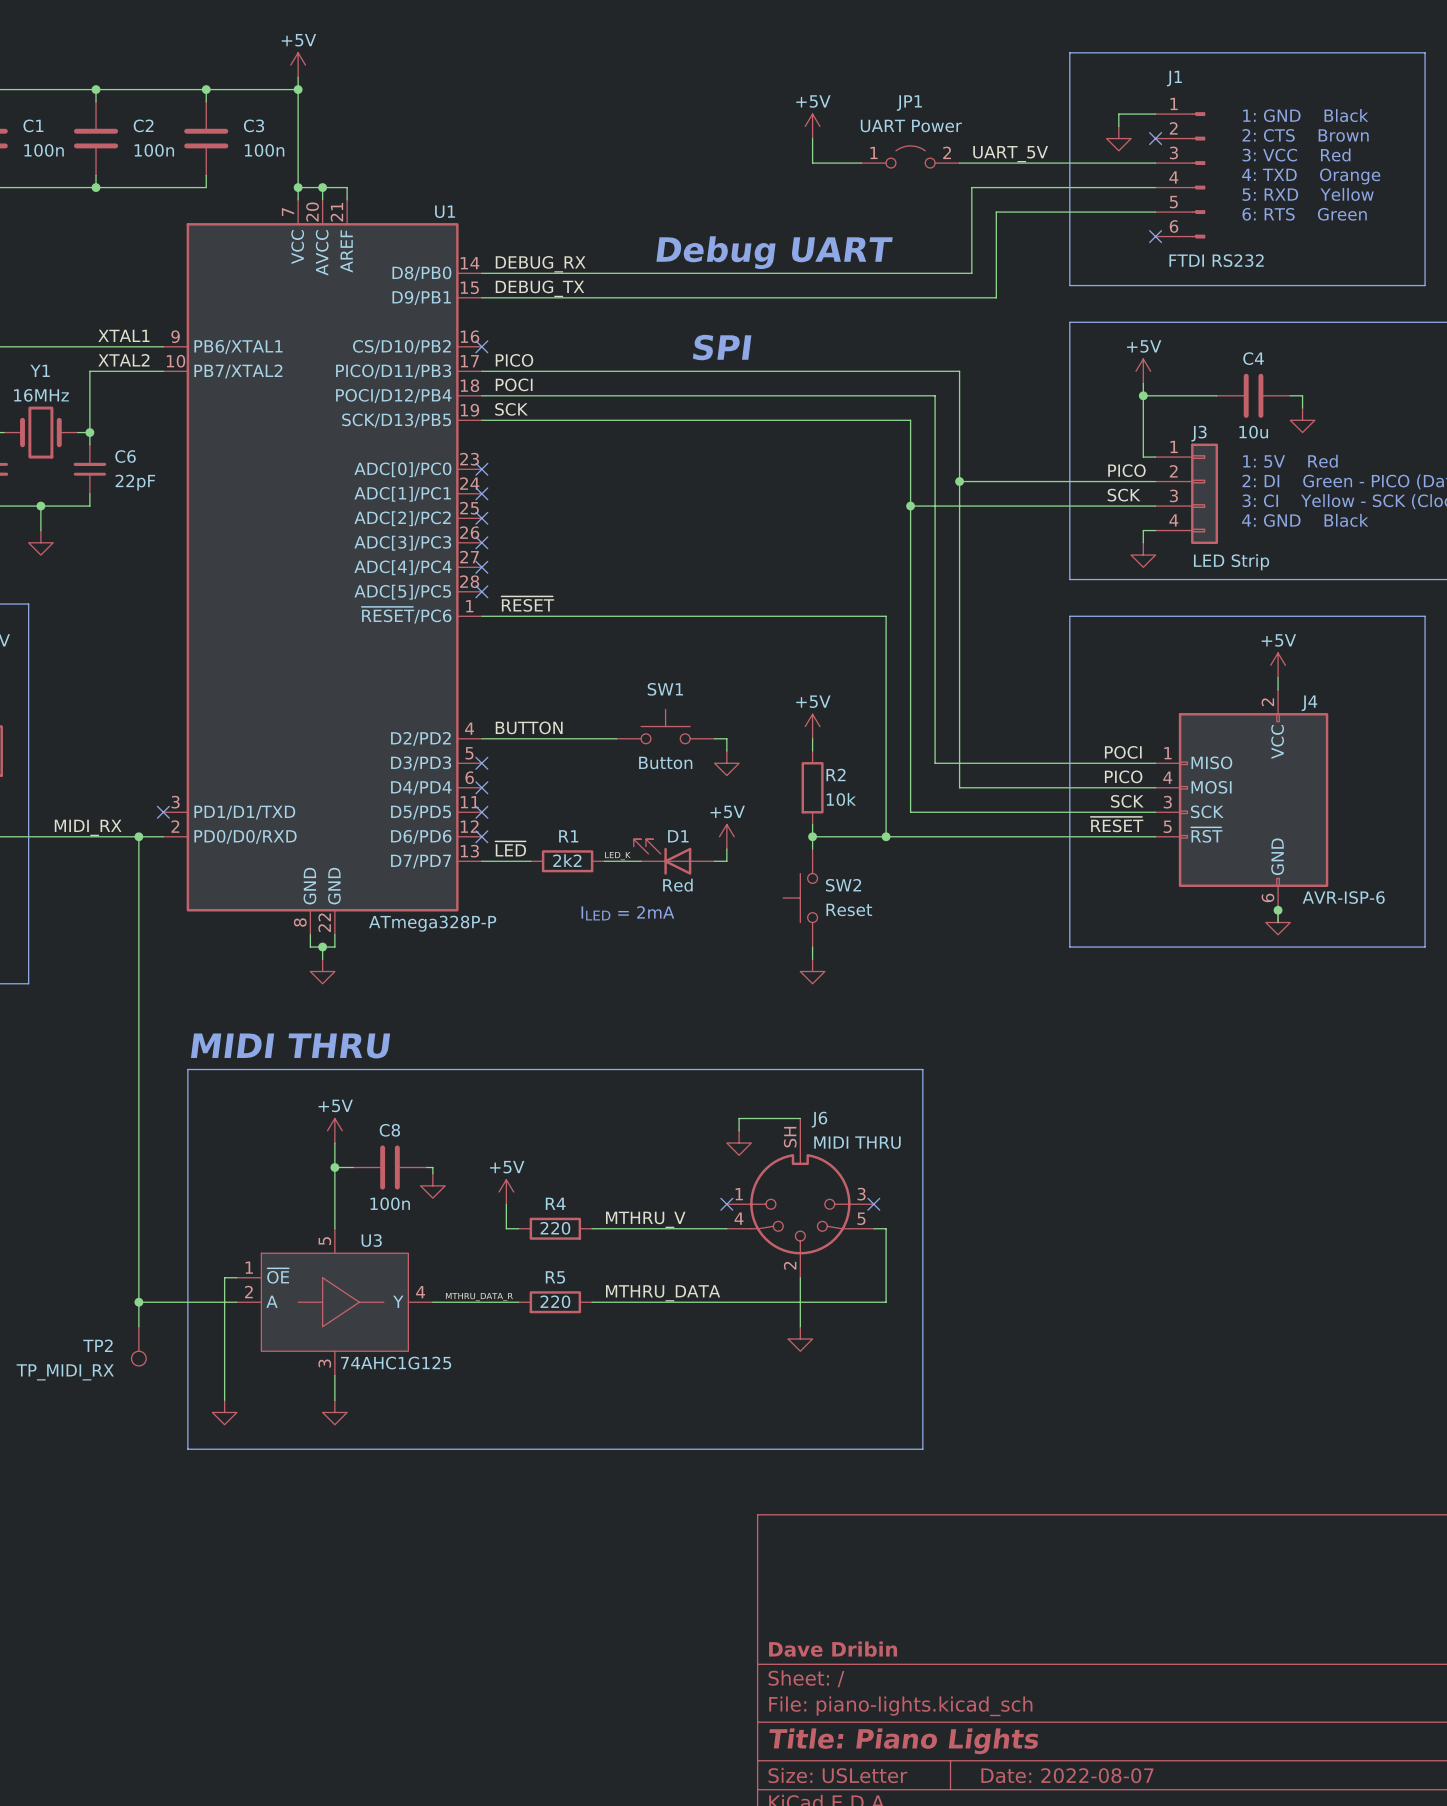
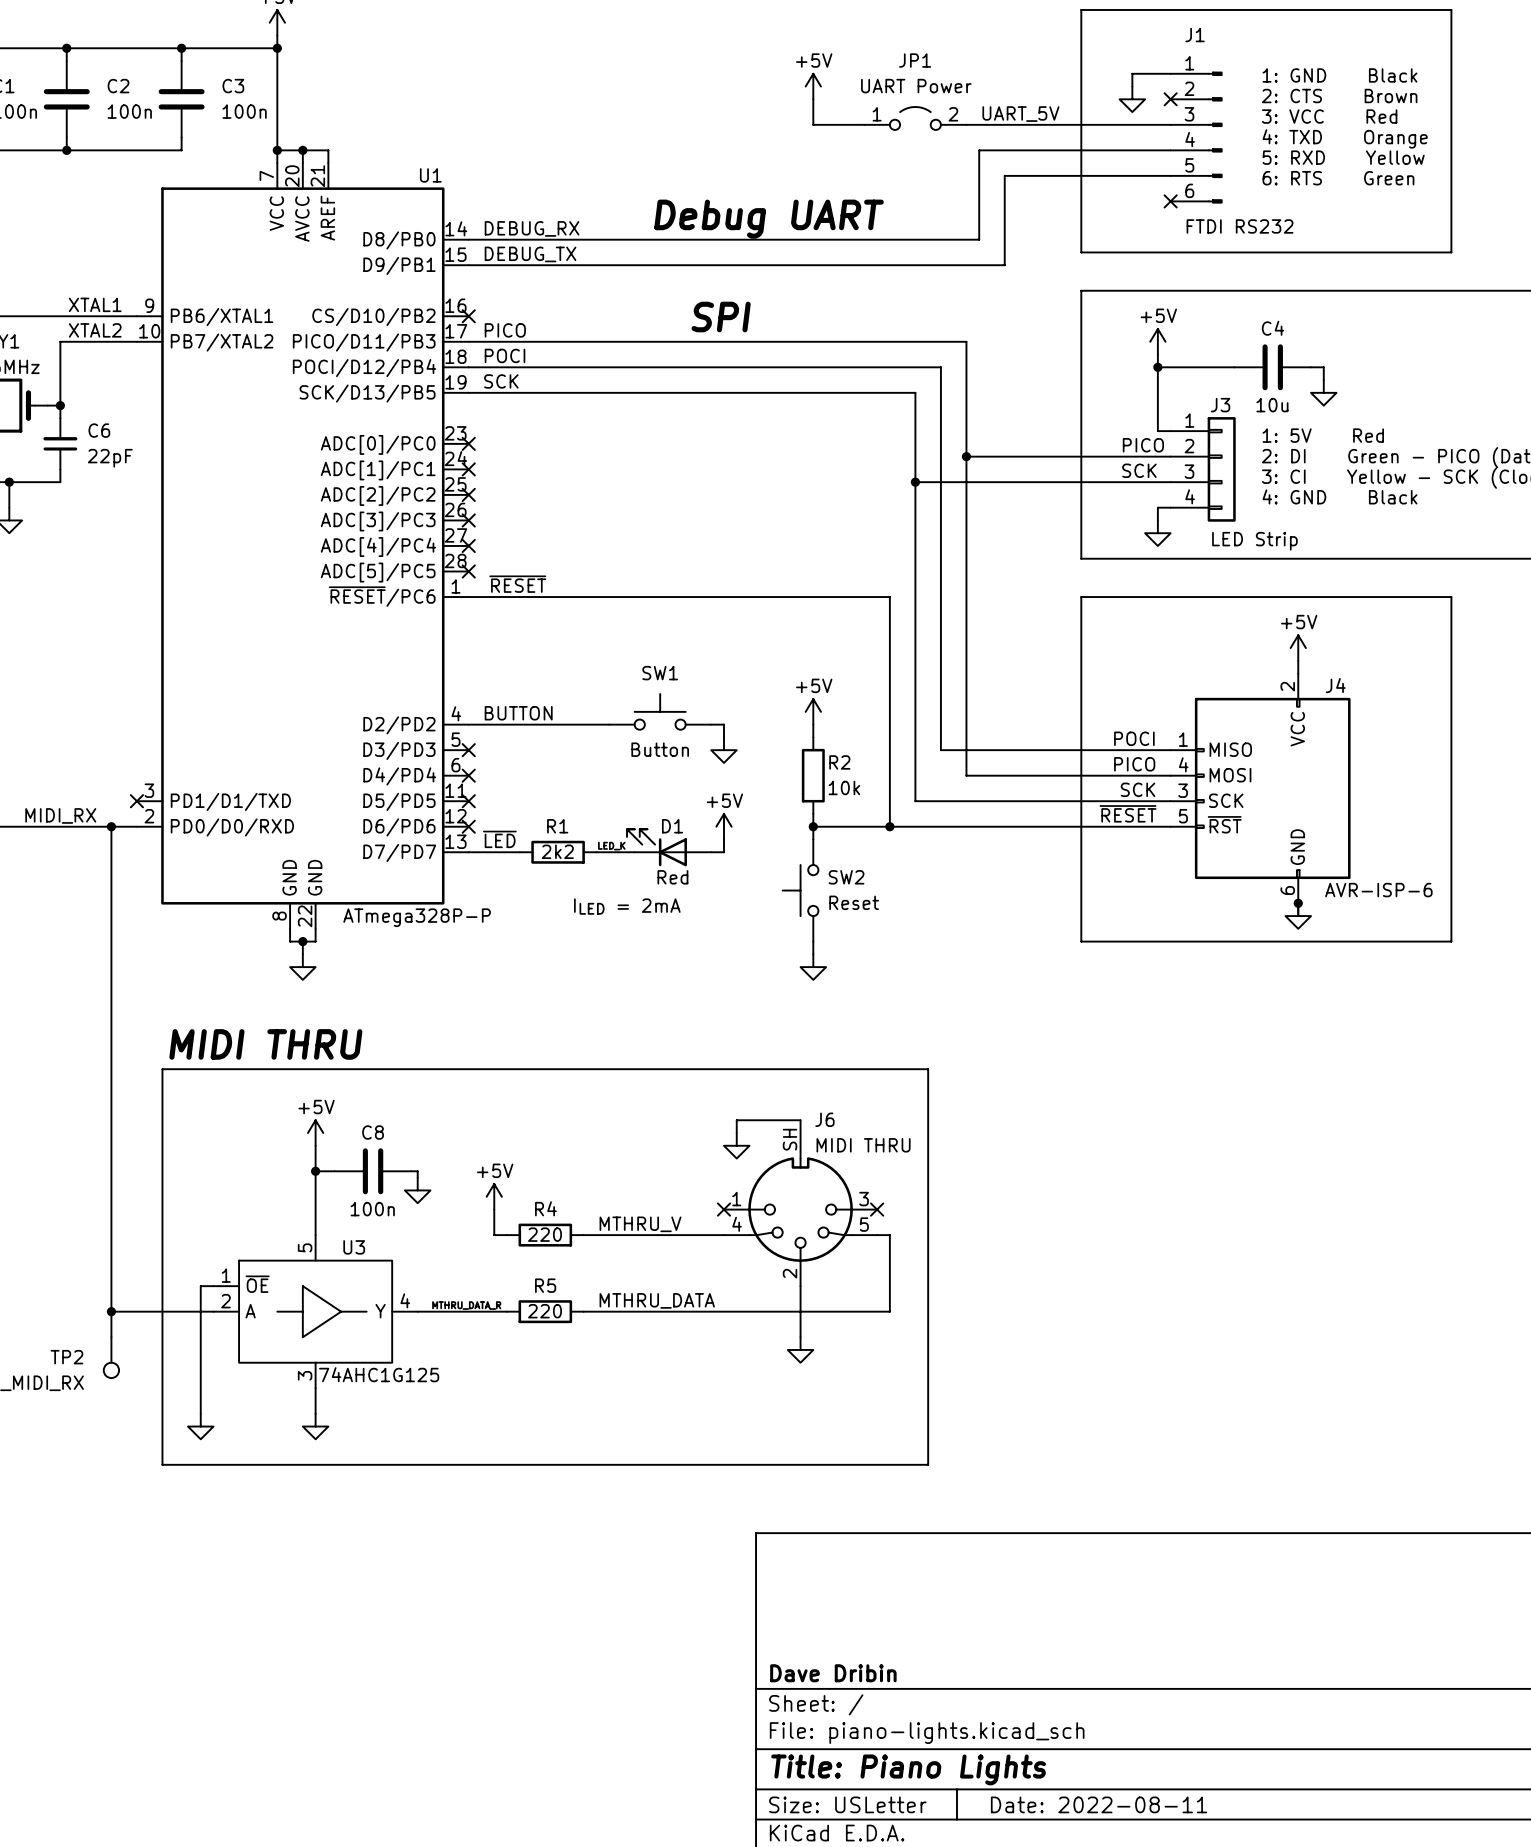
title block: Date: 2022-08-07 (1067, 1775) -> Date: 2022-08-11 (1099, 1804)

